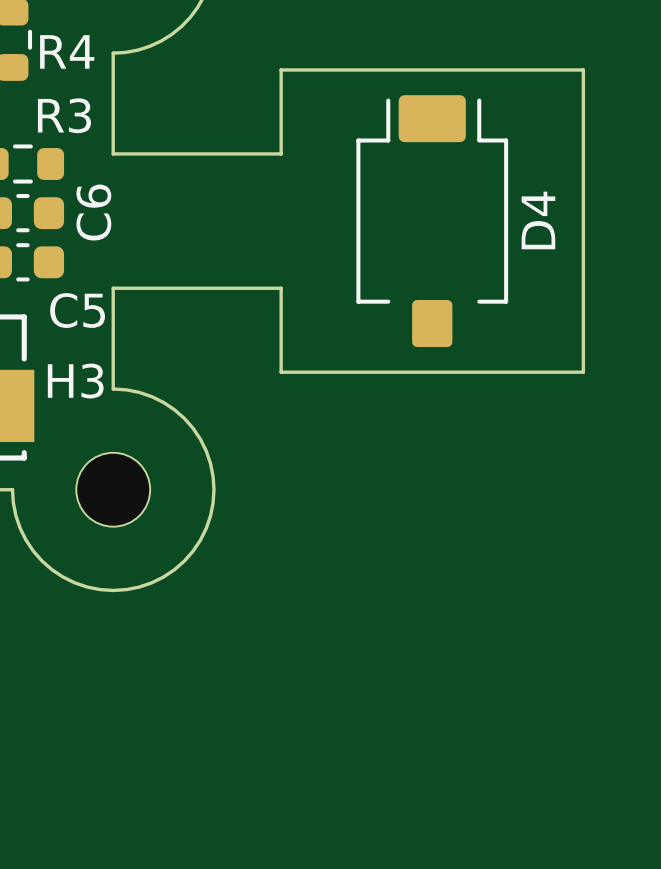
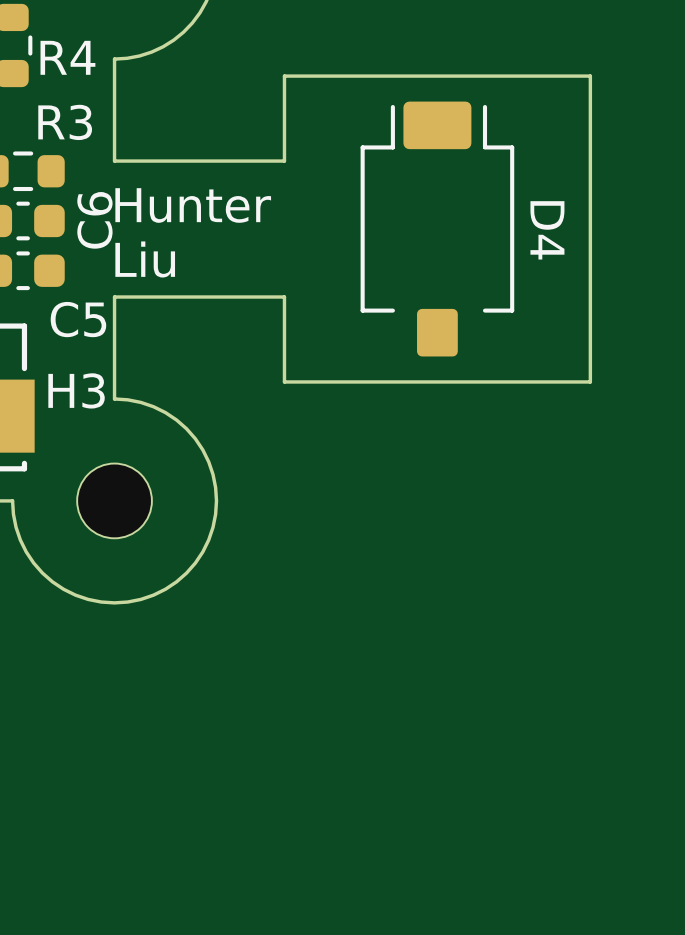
text: none -> Hunter (193, 205)
D4 name rotation: 0° (538, 220) -> 180° (547, 230)
text: none -> Liu (145, 259)

